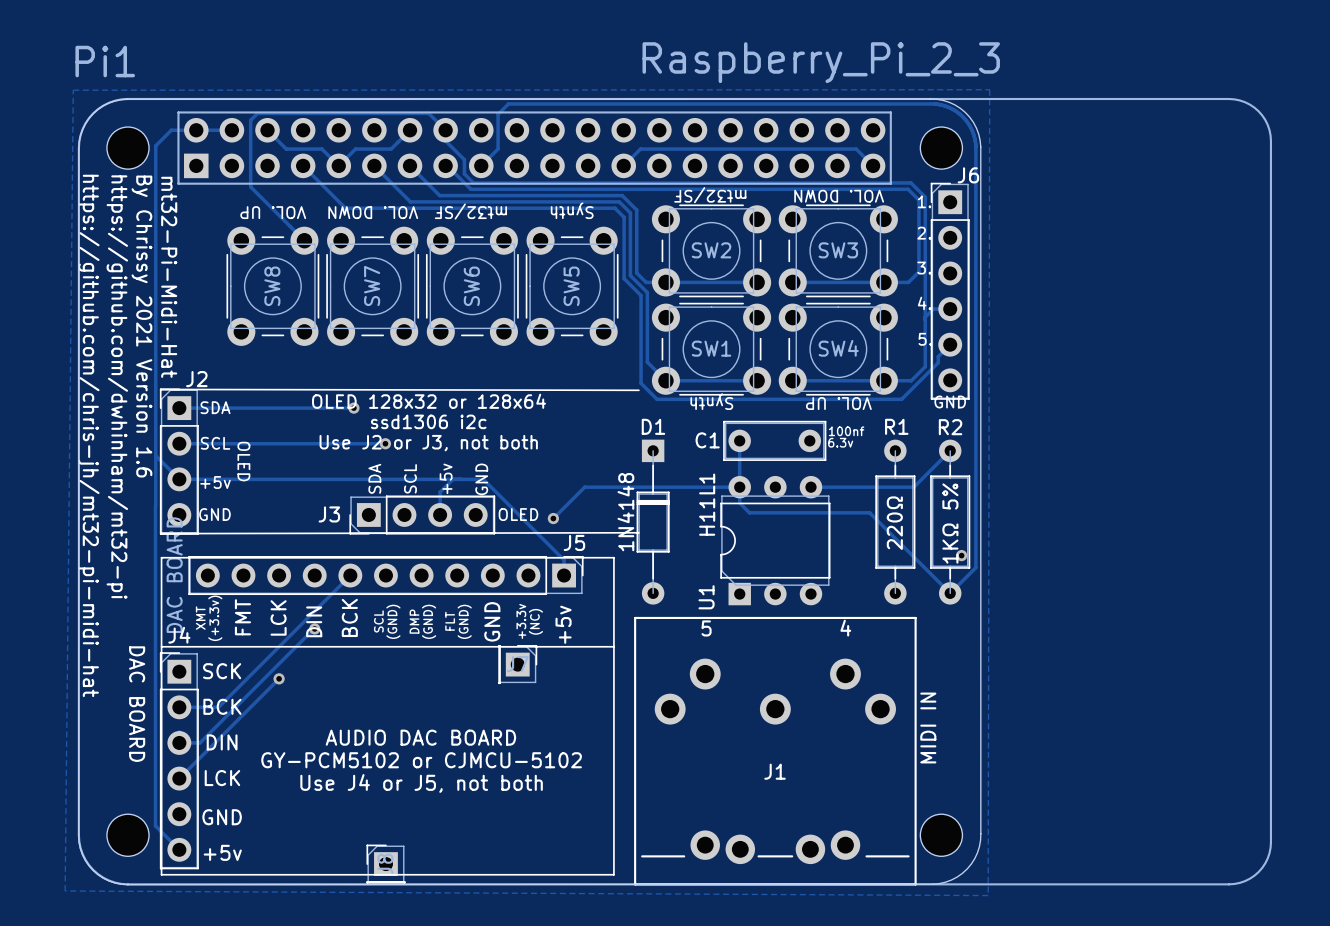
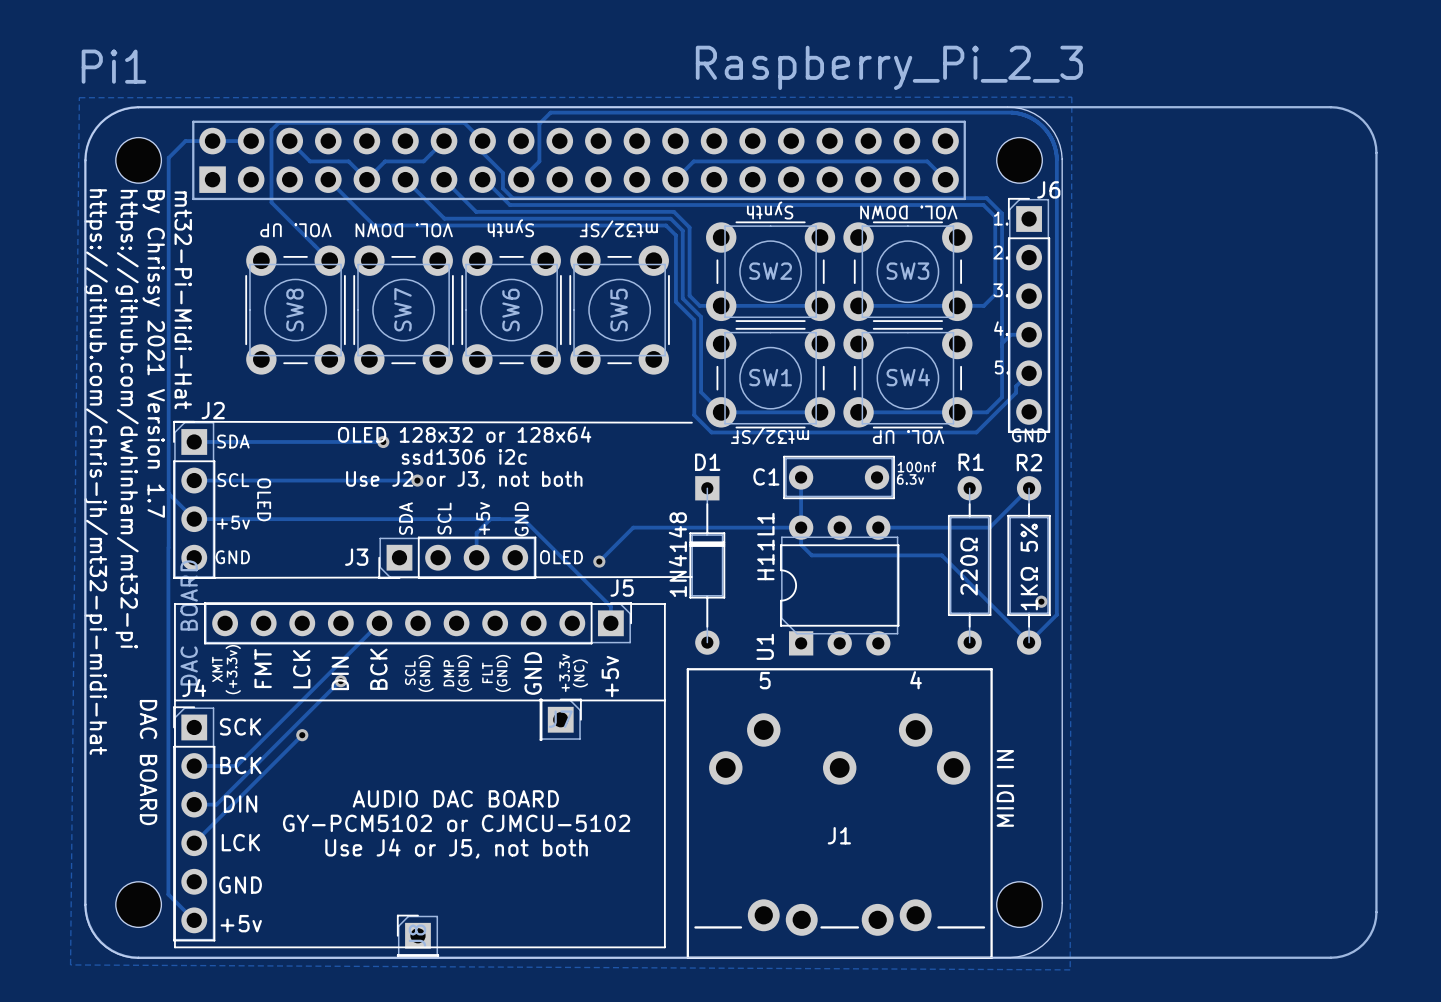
text: mt32/SF (710, 195) -> Synth (770, 210)
text: Synth (572, 210) -> mt32/SF (618, 229)
text: mt32/SF (470, 211) -> Synth (510, 228)
text: By Chrissy 2021 Version 1.6 (141, 326) -> By Chrissy 2021 Version 1.7 (153, 353)
text: Synth (711, 401) -> mt32/SF (770, 435)

